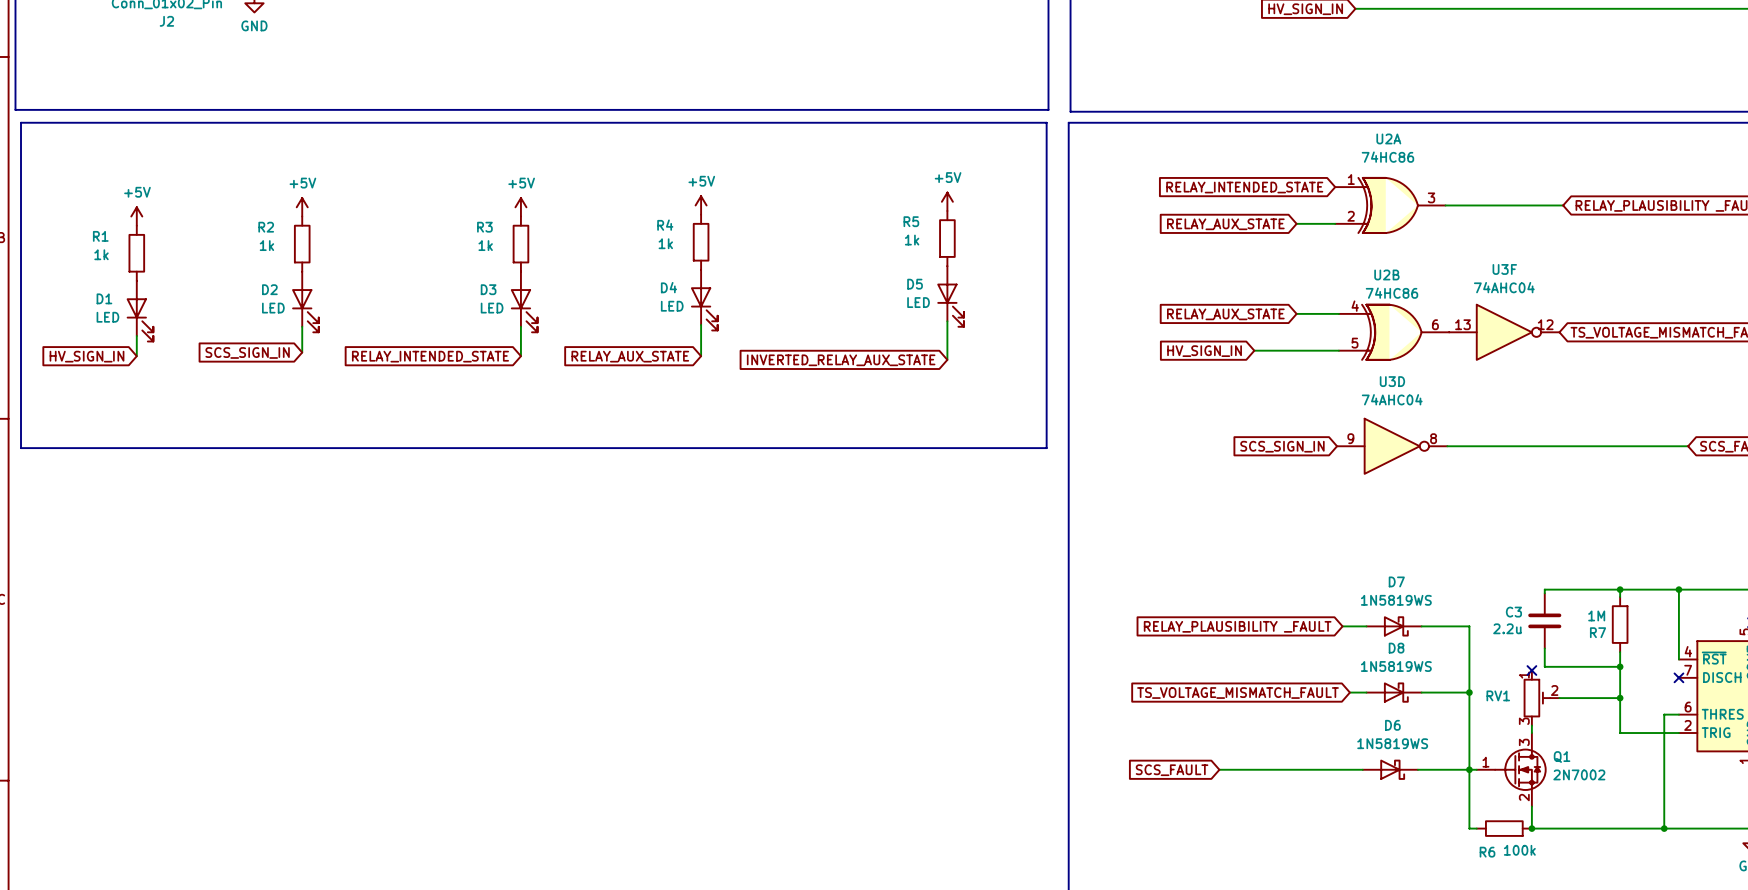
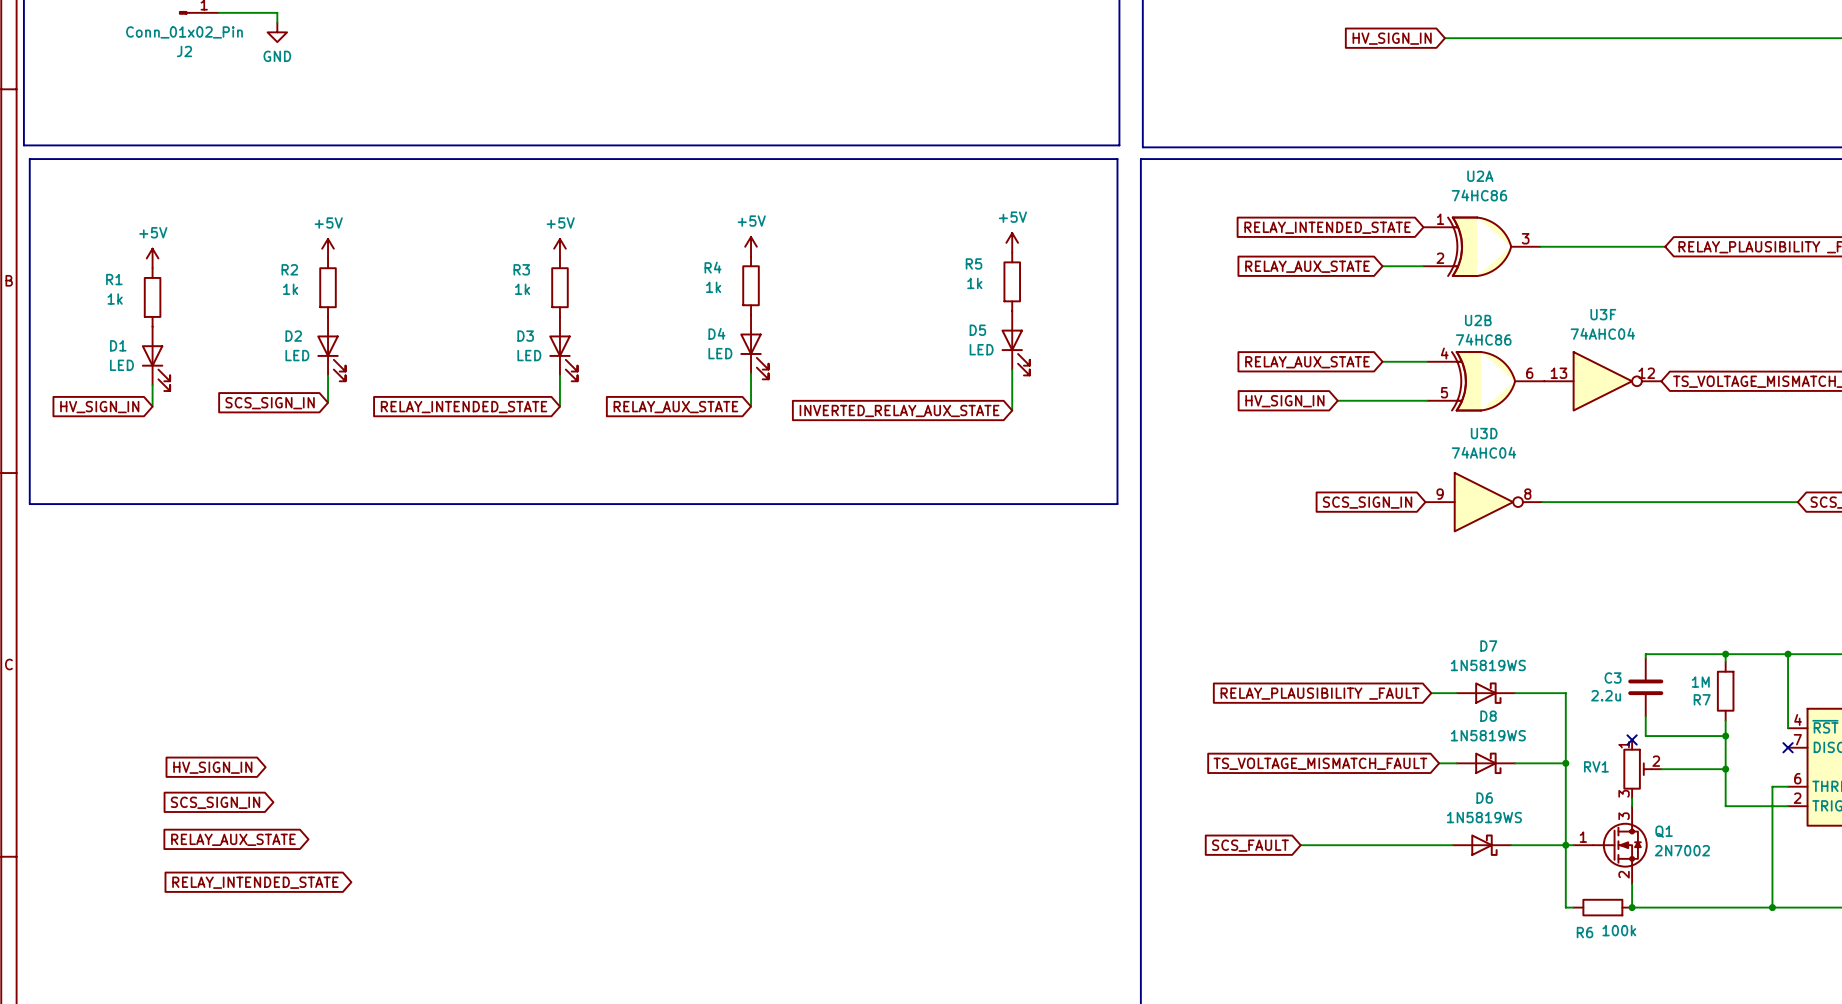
global label: none -> HV_SIGN_IN (212, 767)
global label: none -> SCS_SIGN_IN (215, 802)
global label: none -> RELAY_AUX_STATE (233, 839)
global label: none -> RELAY_INTENDED_STATE (255, 882)

